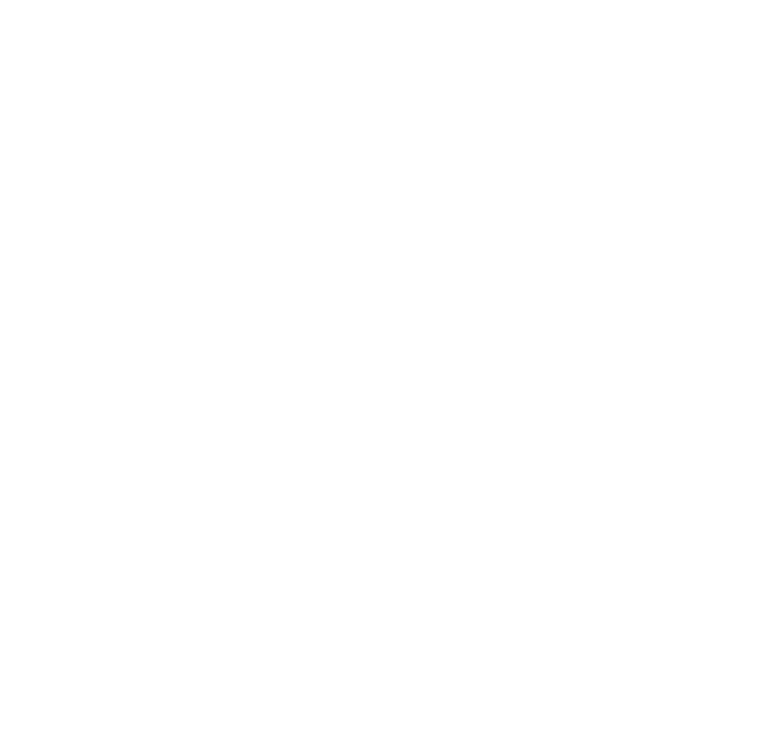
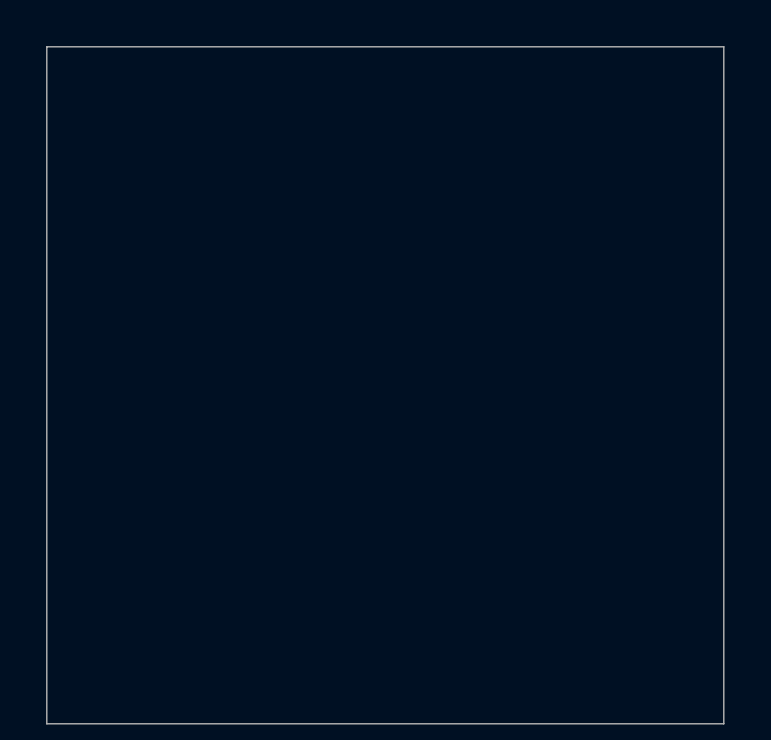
line: none -> (46, 46) (723, 46) (723, 723) (46, 723) (46, 46)

